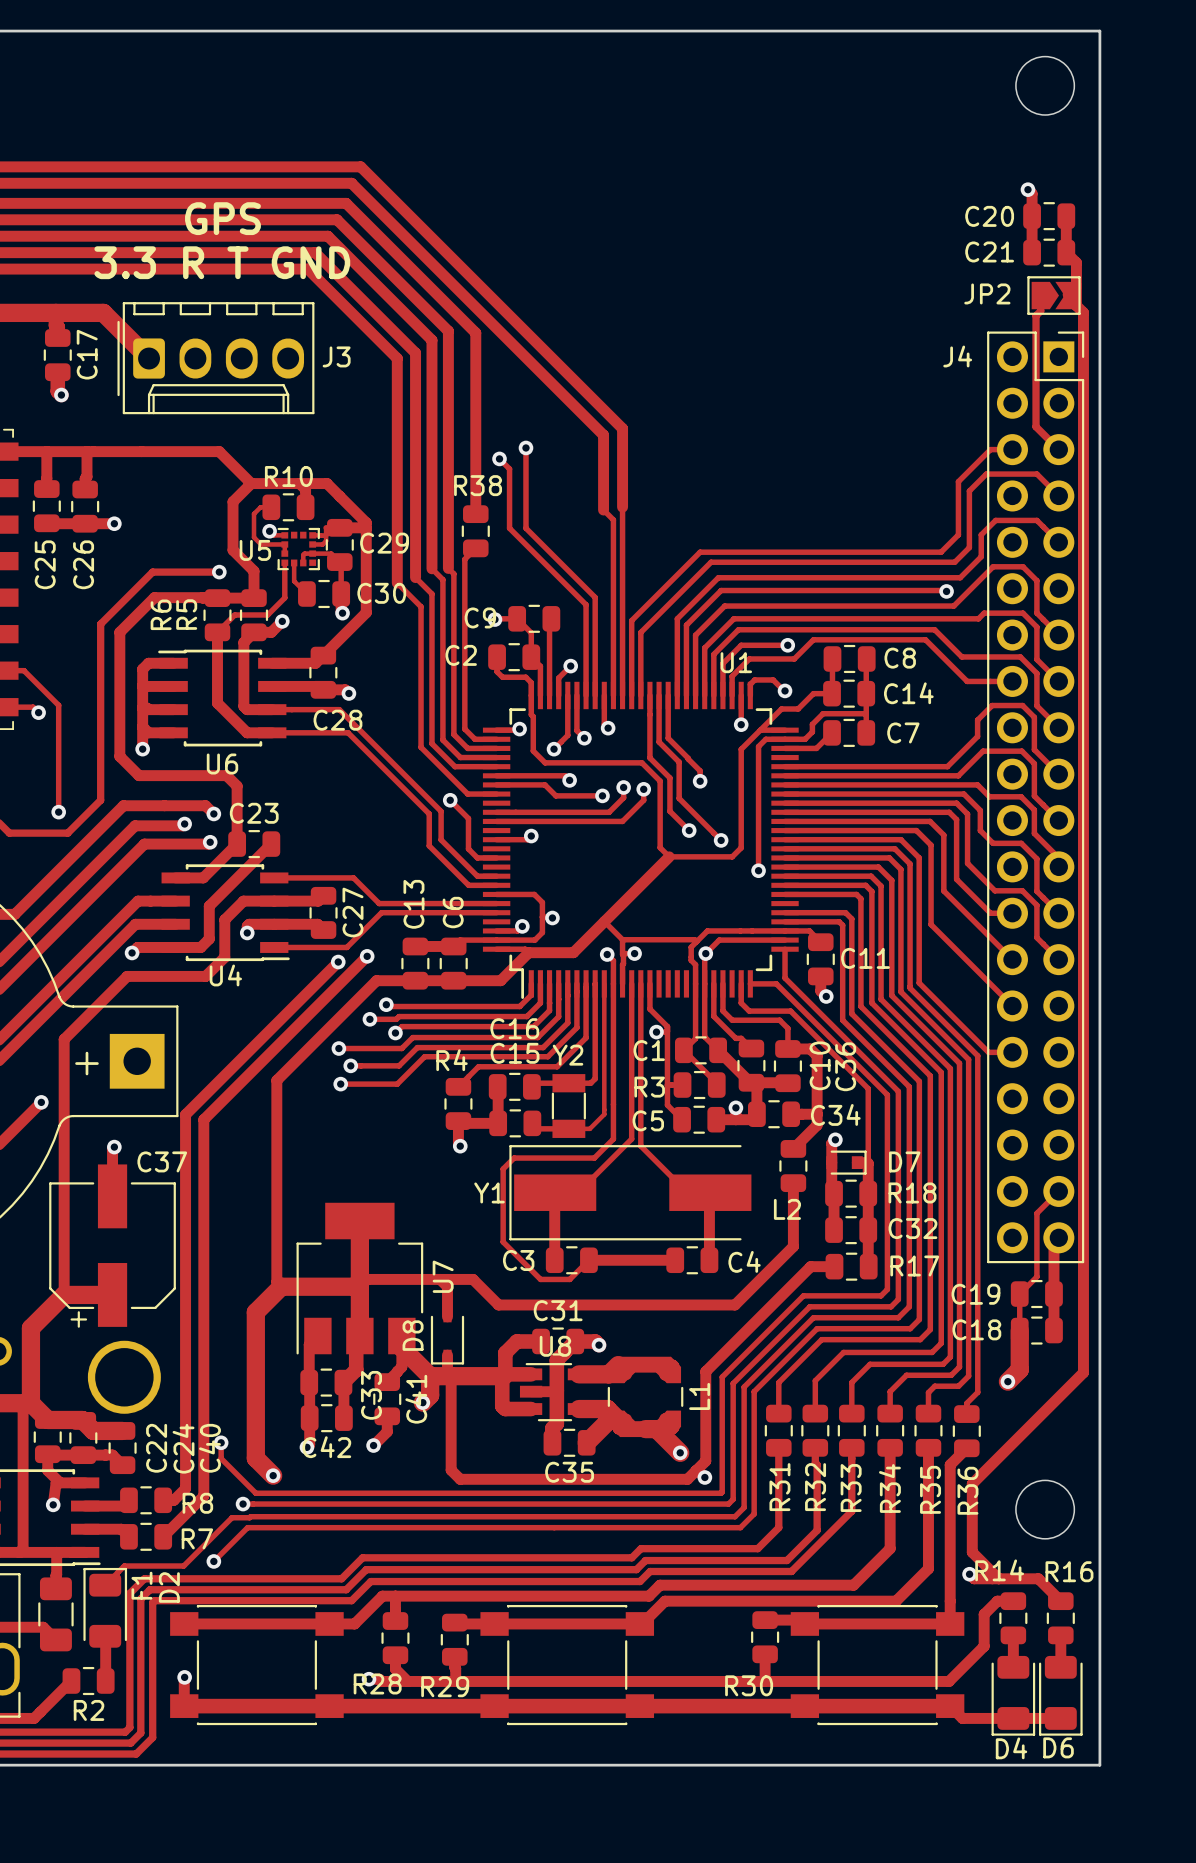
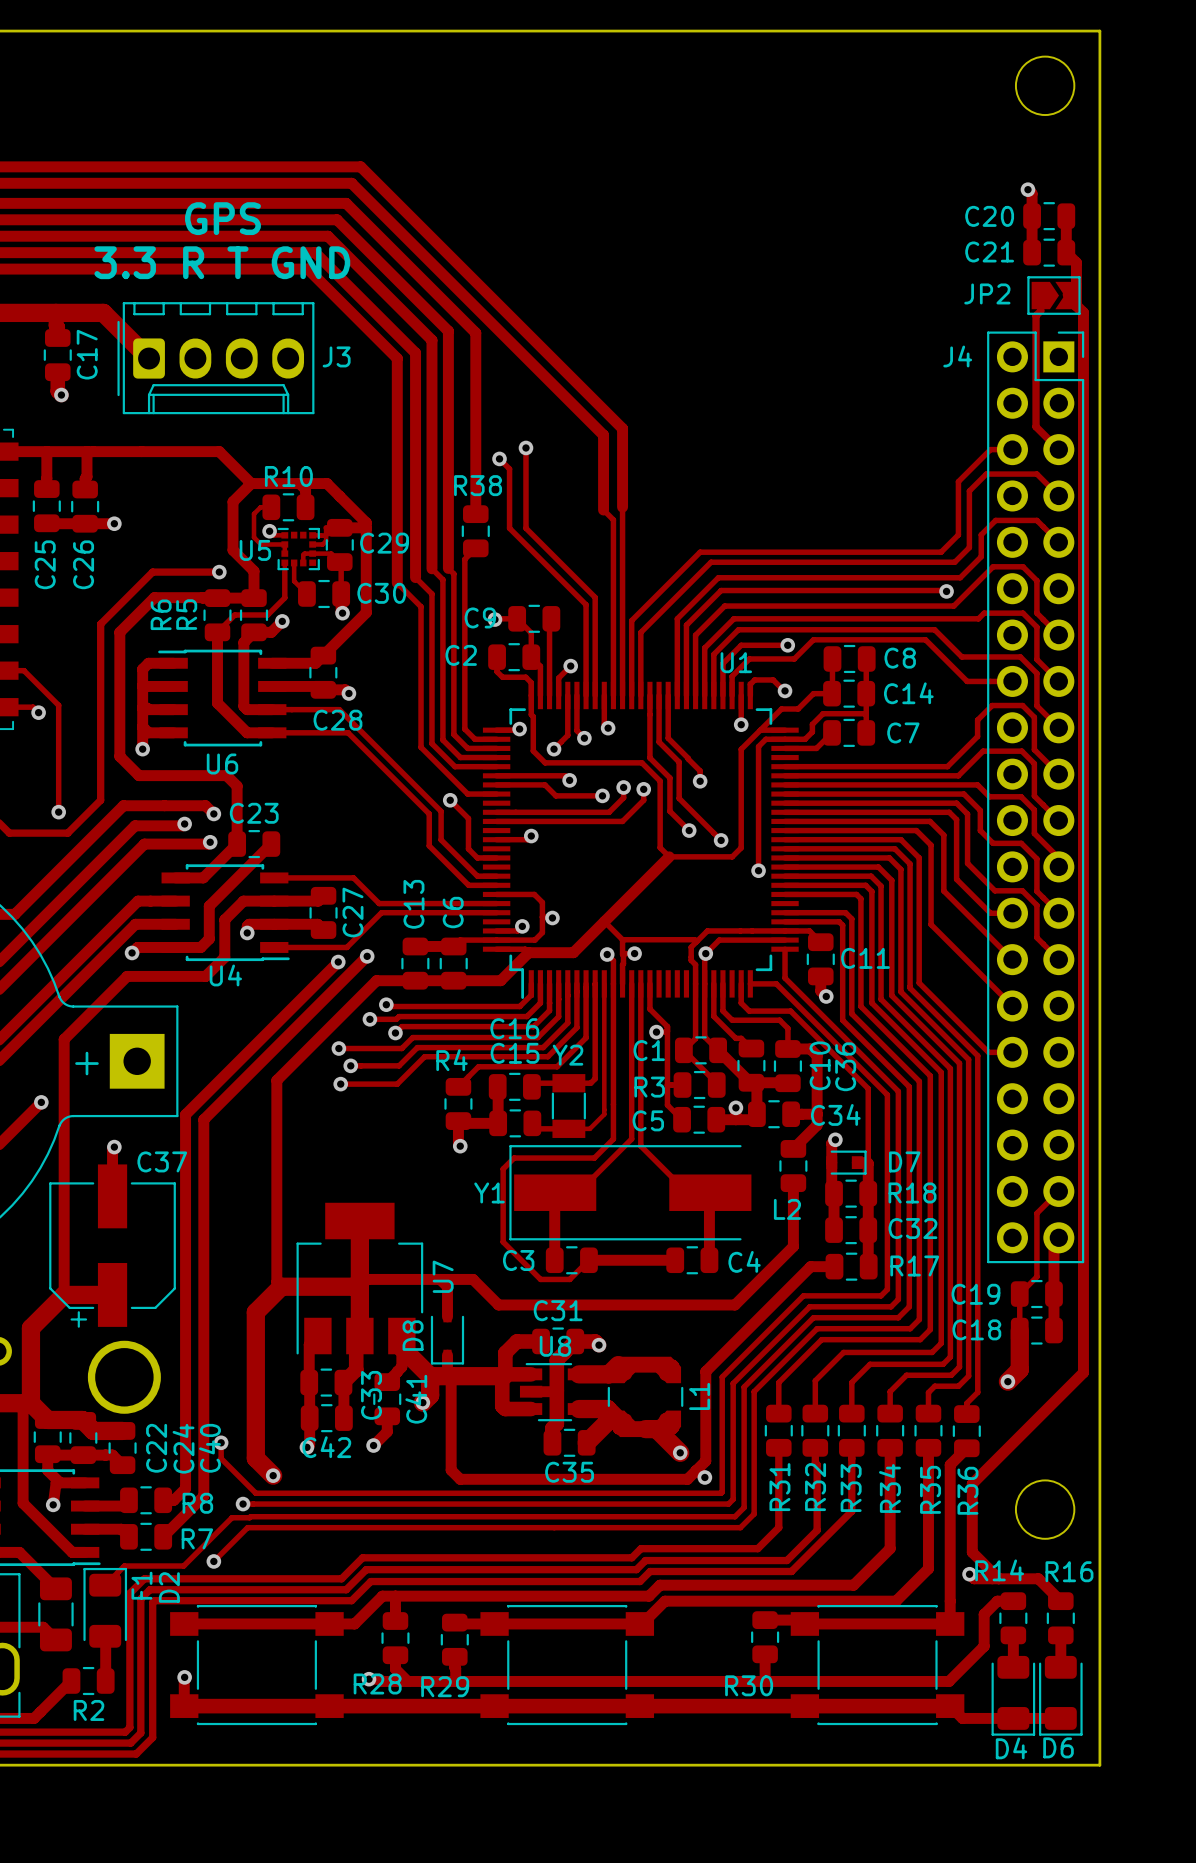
track: (23, 1503) (23, 1548) (19, 1552) (72, 1552) -> (23, 1503) (72, 1552)
track: (56, 1552) (55, 1588) -> (19, 1552) (55, 1588)

